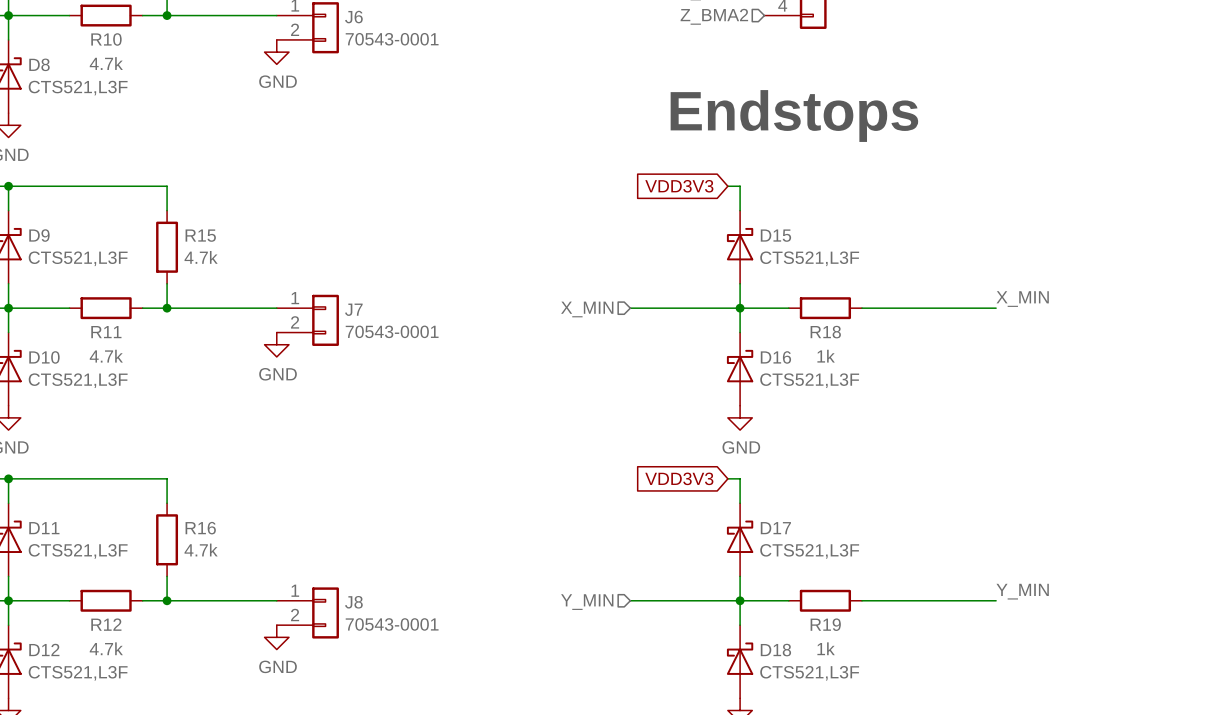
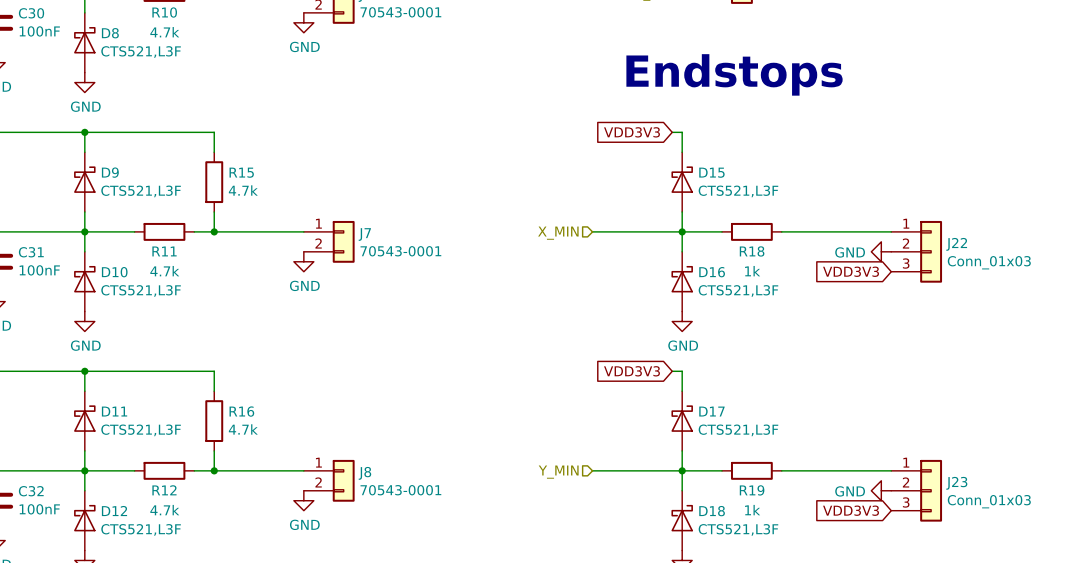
label: X_MIN (1022, 299) -> none
power symbol: none -> GND (881, 251)
J22: none -> Conn_01x03 (916, 251)
global label: none -> VDD3V3 (851, 271)
label: Y_MIN (1022, 591) -> none
power symbol: none -> GND (881, 490)
J23: none -> Conn_01x03 (916, 490)
global label: none -> VDD3V3 (851, 510)

